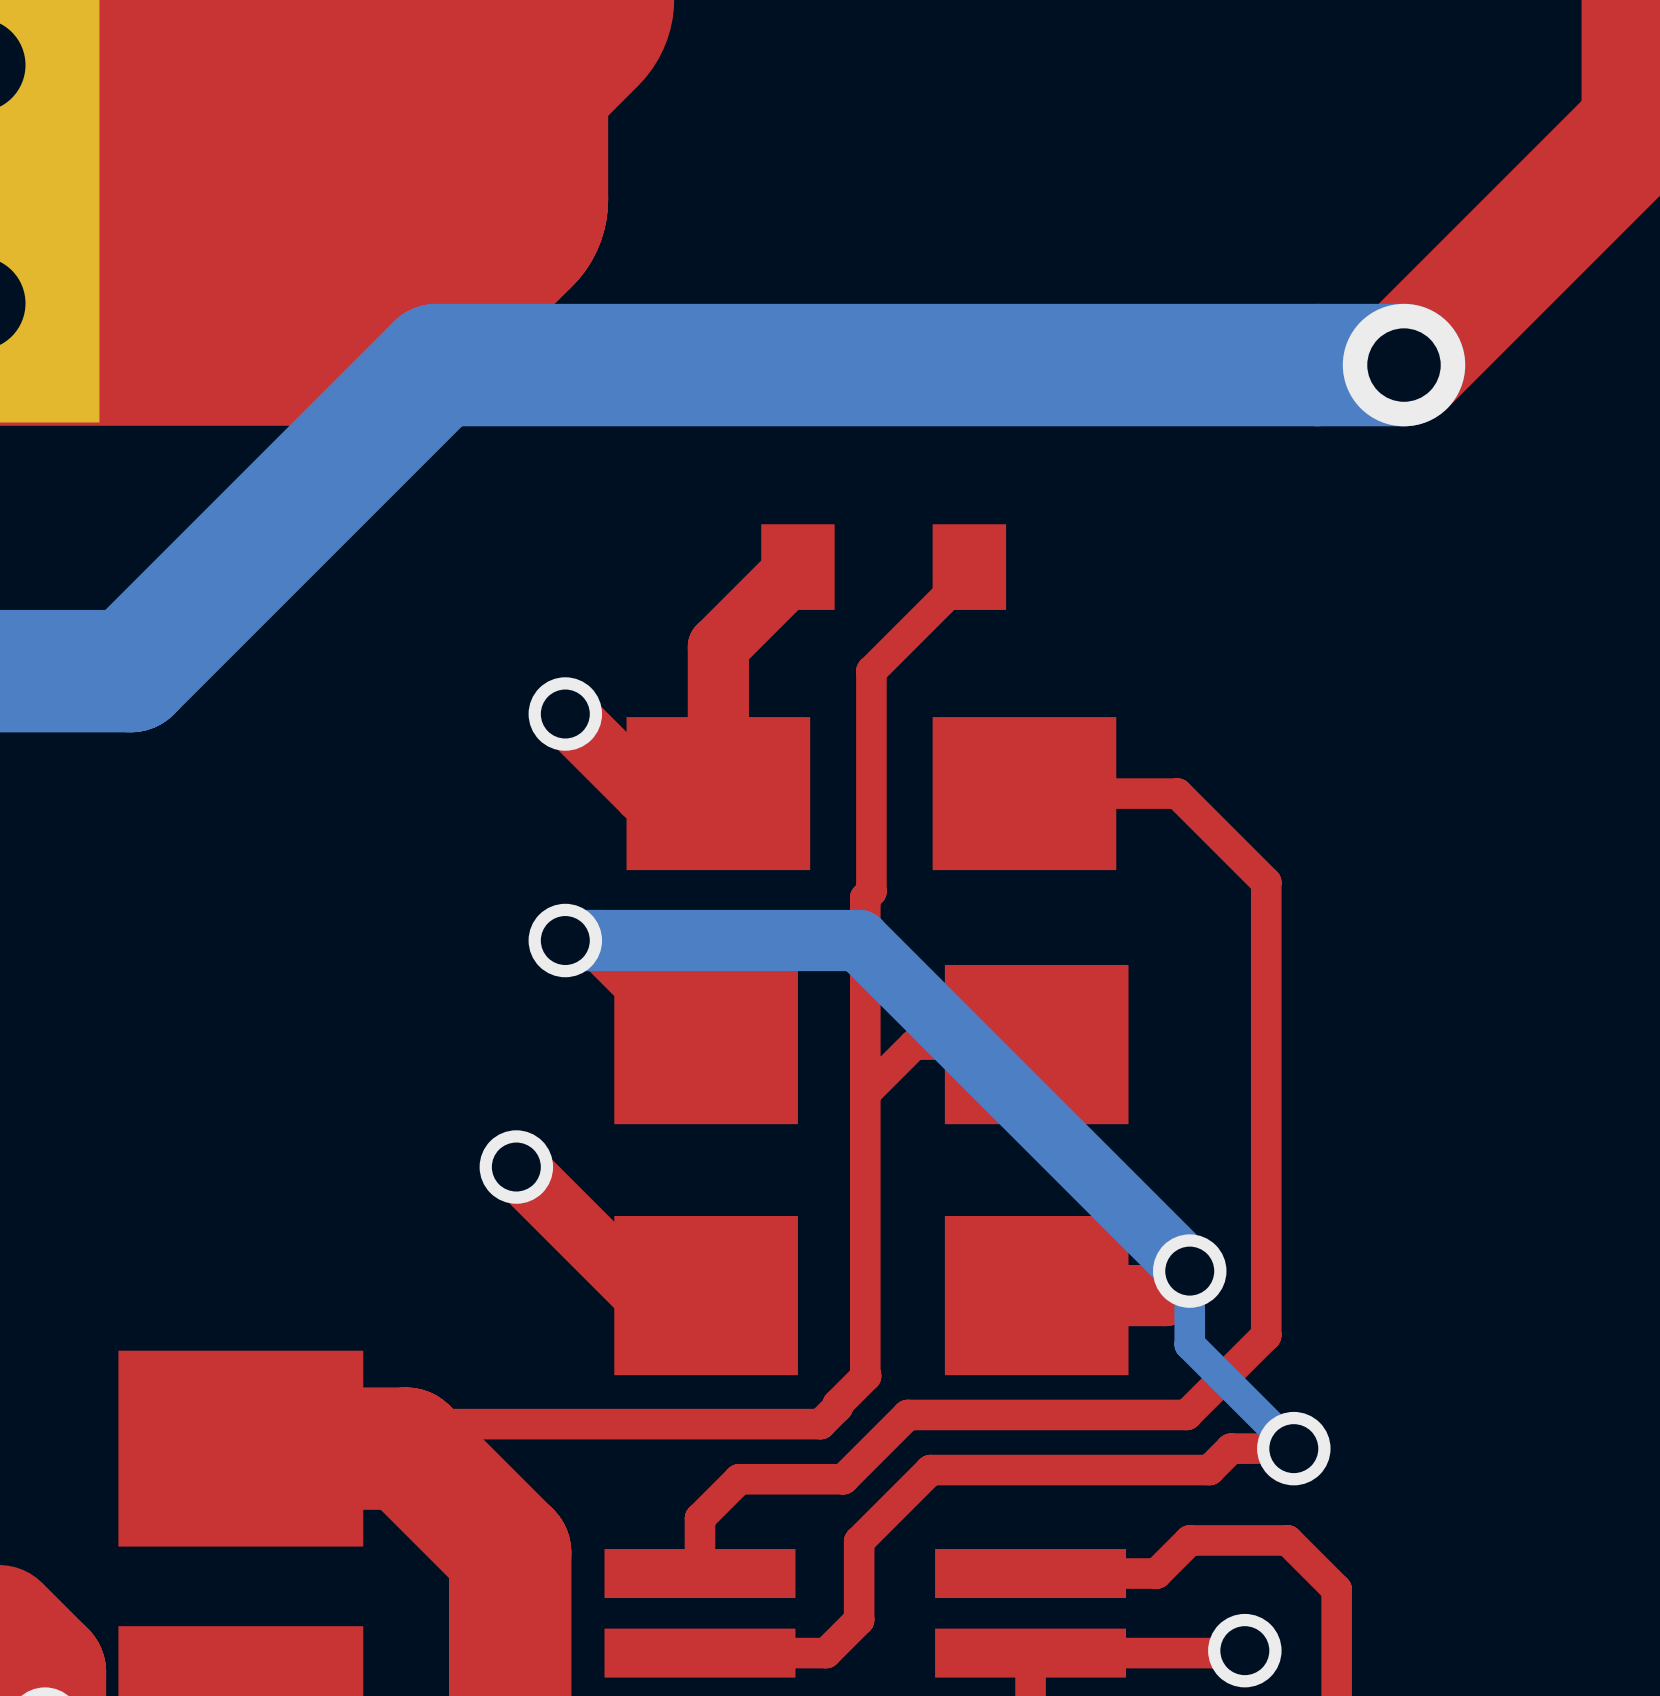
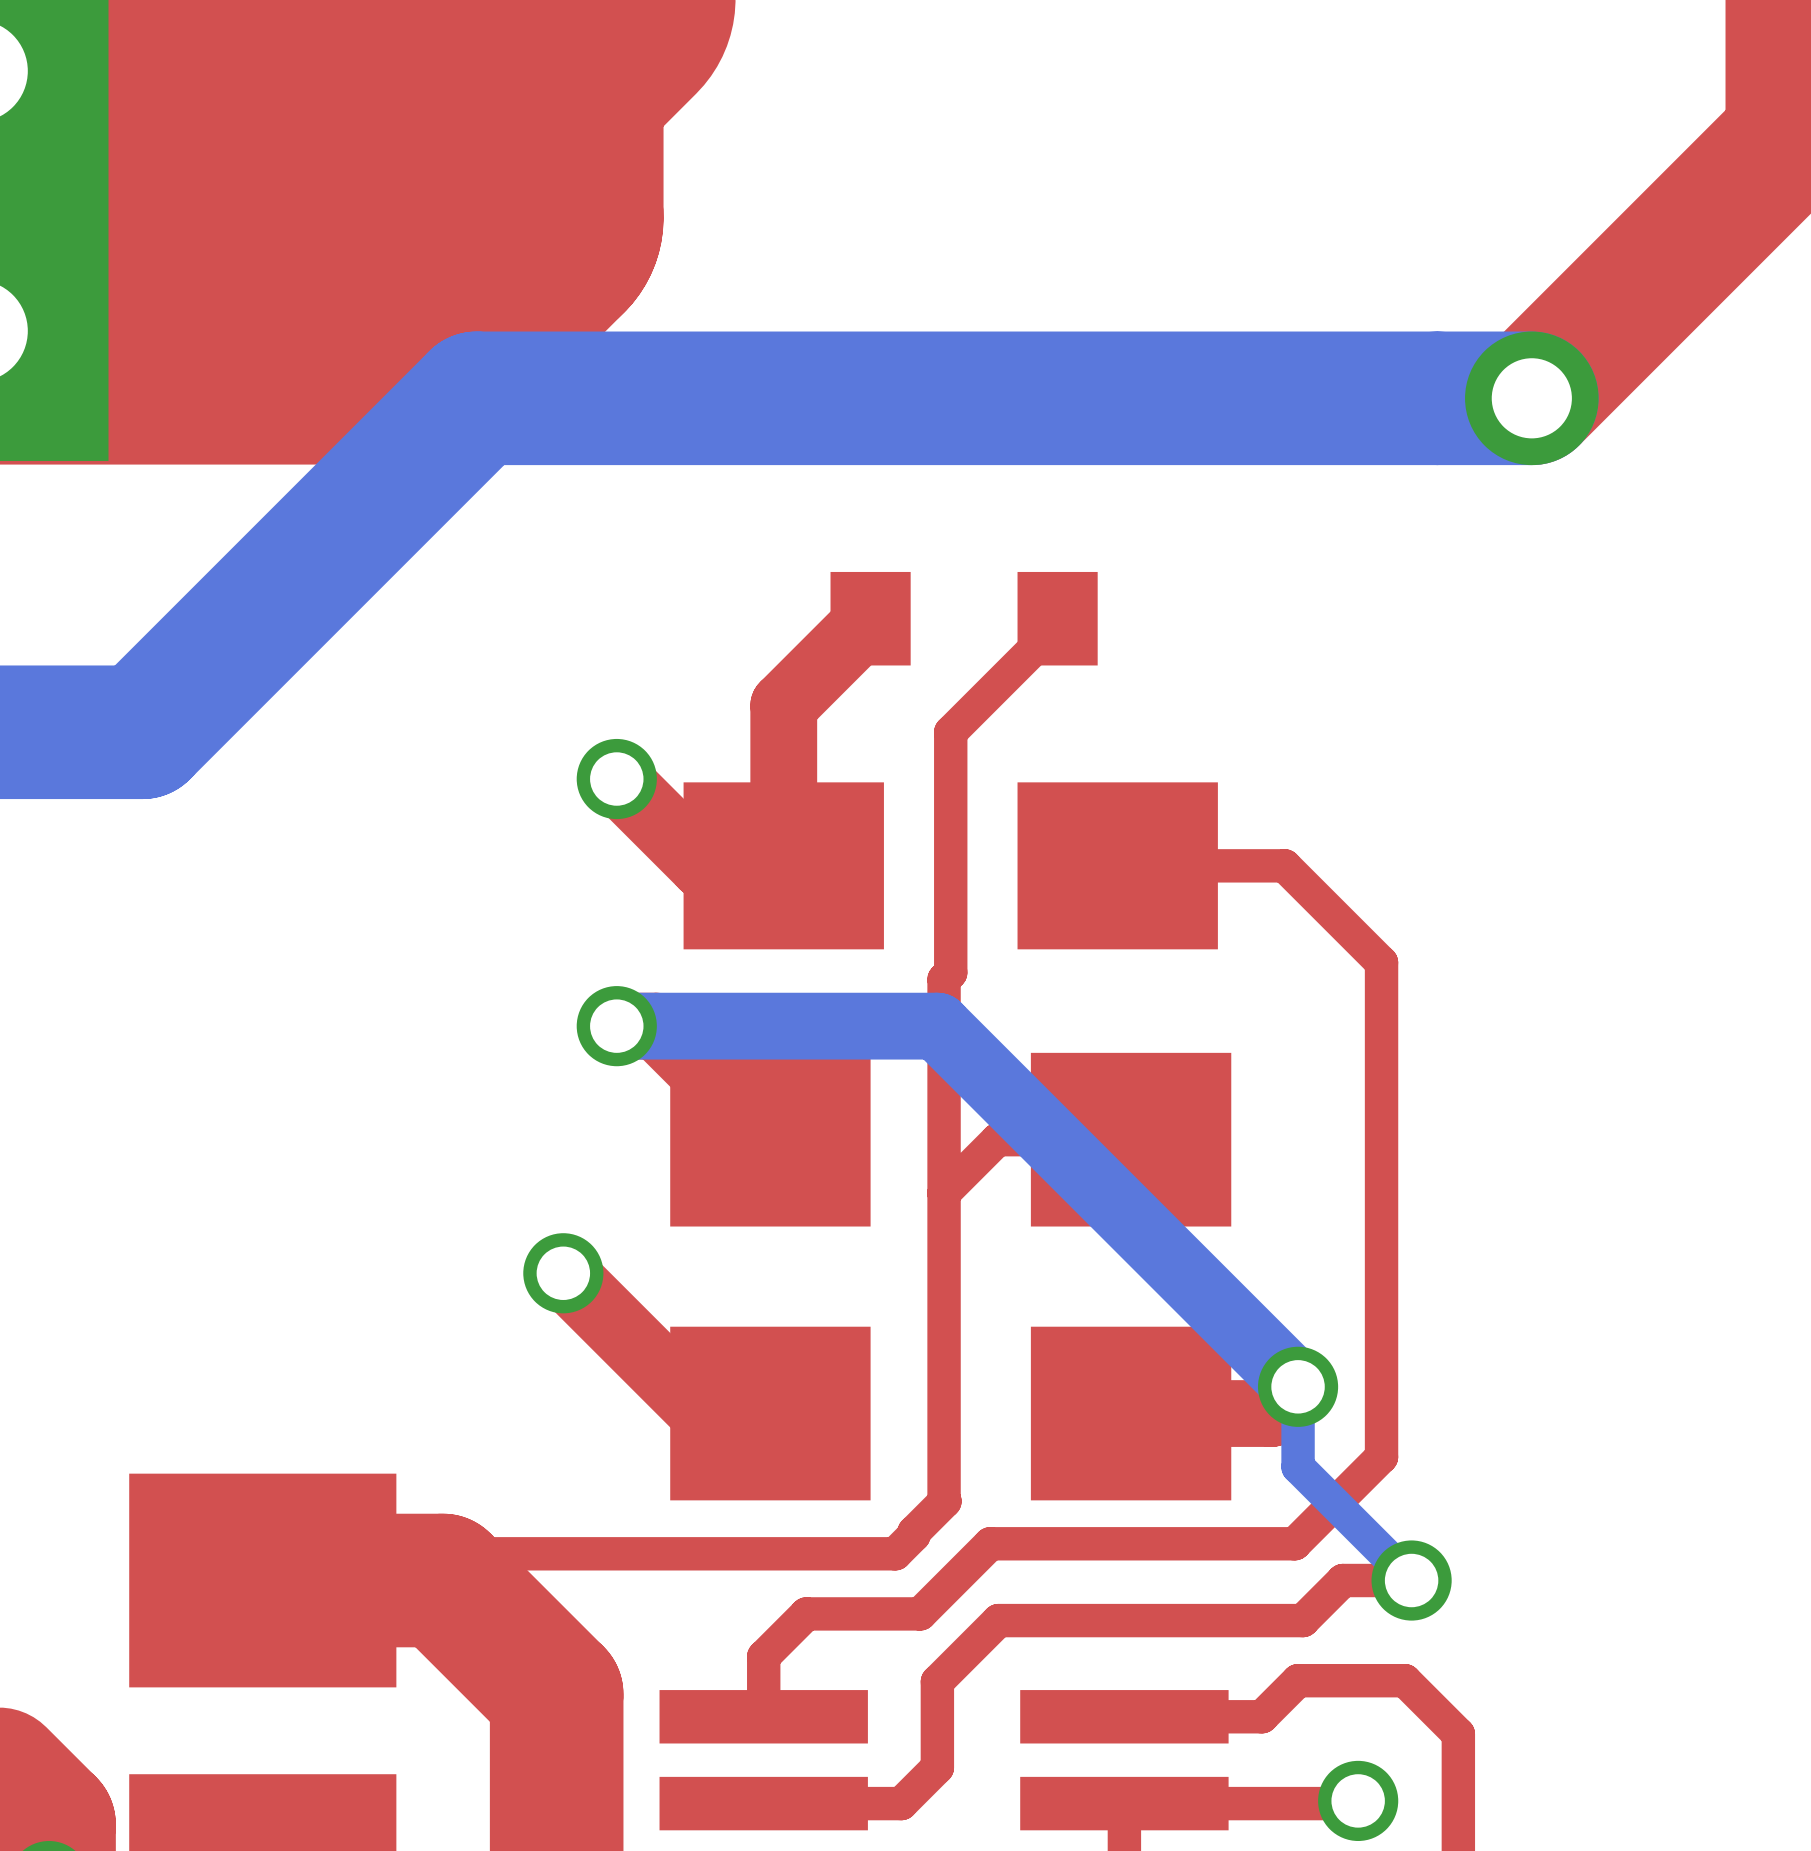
top track: (1209, 1470) (930, 1470) (915, 1485) -> (1319, 1603) (1302, 1620) (998, 1620)

